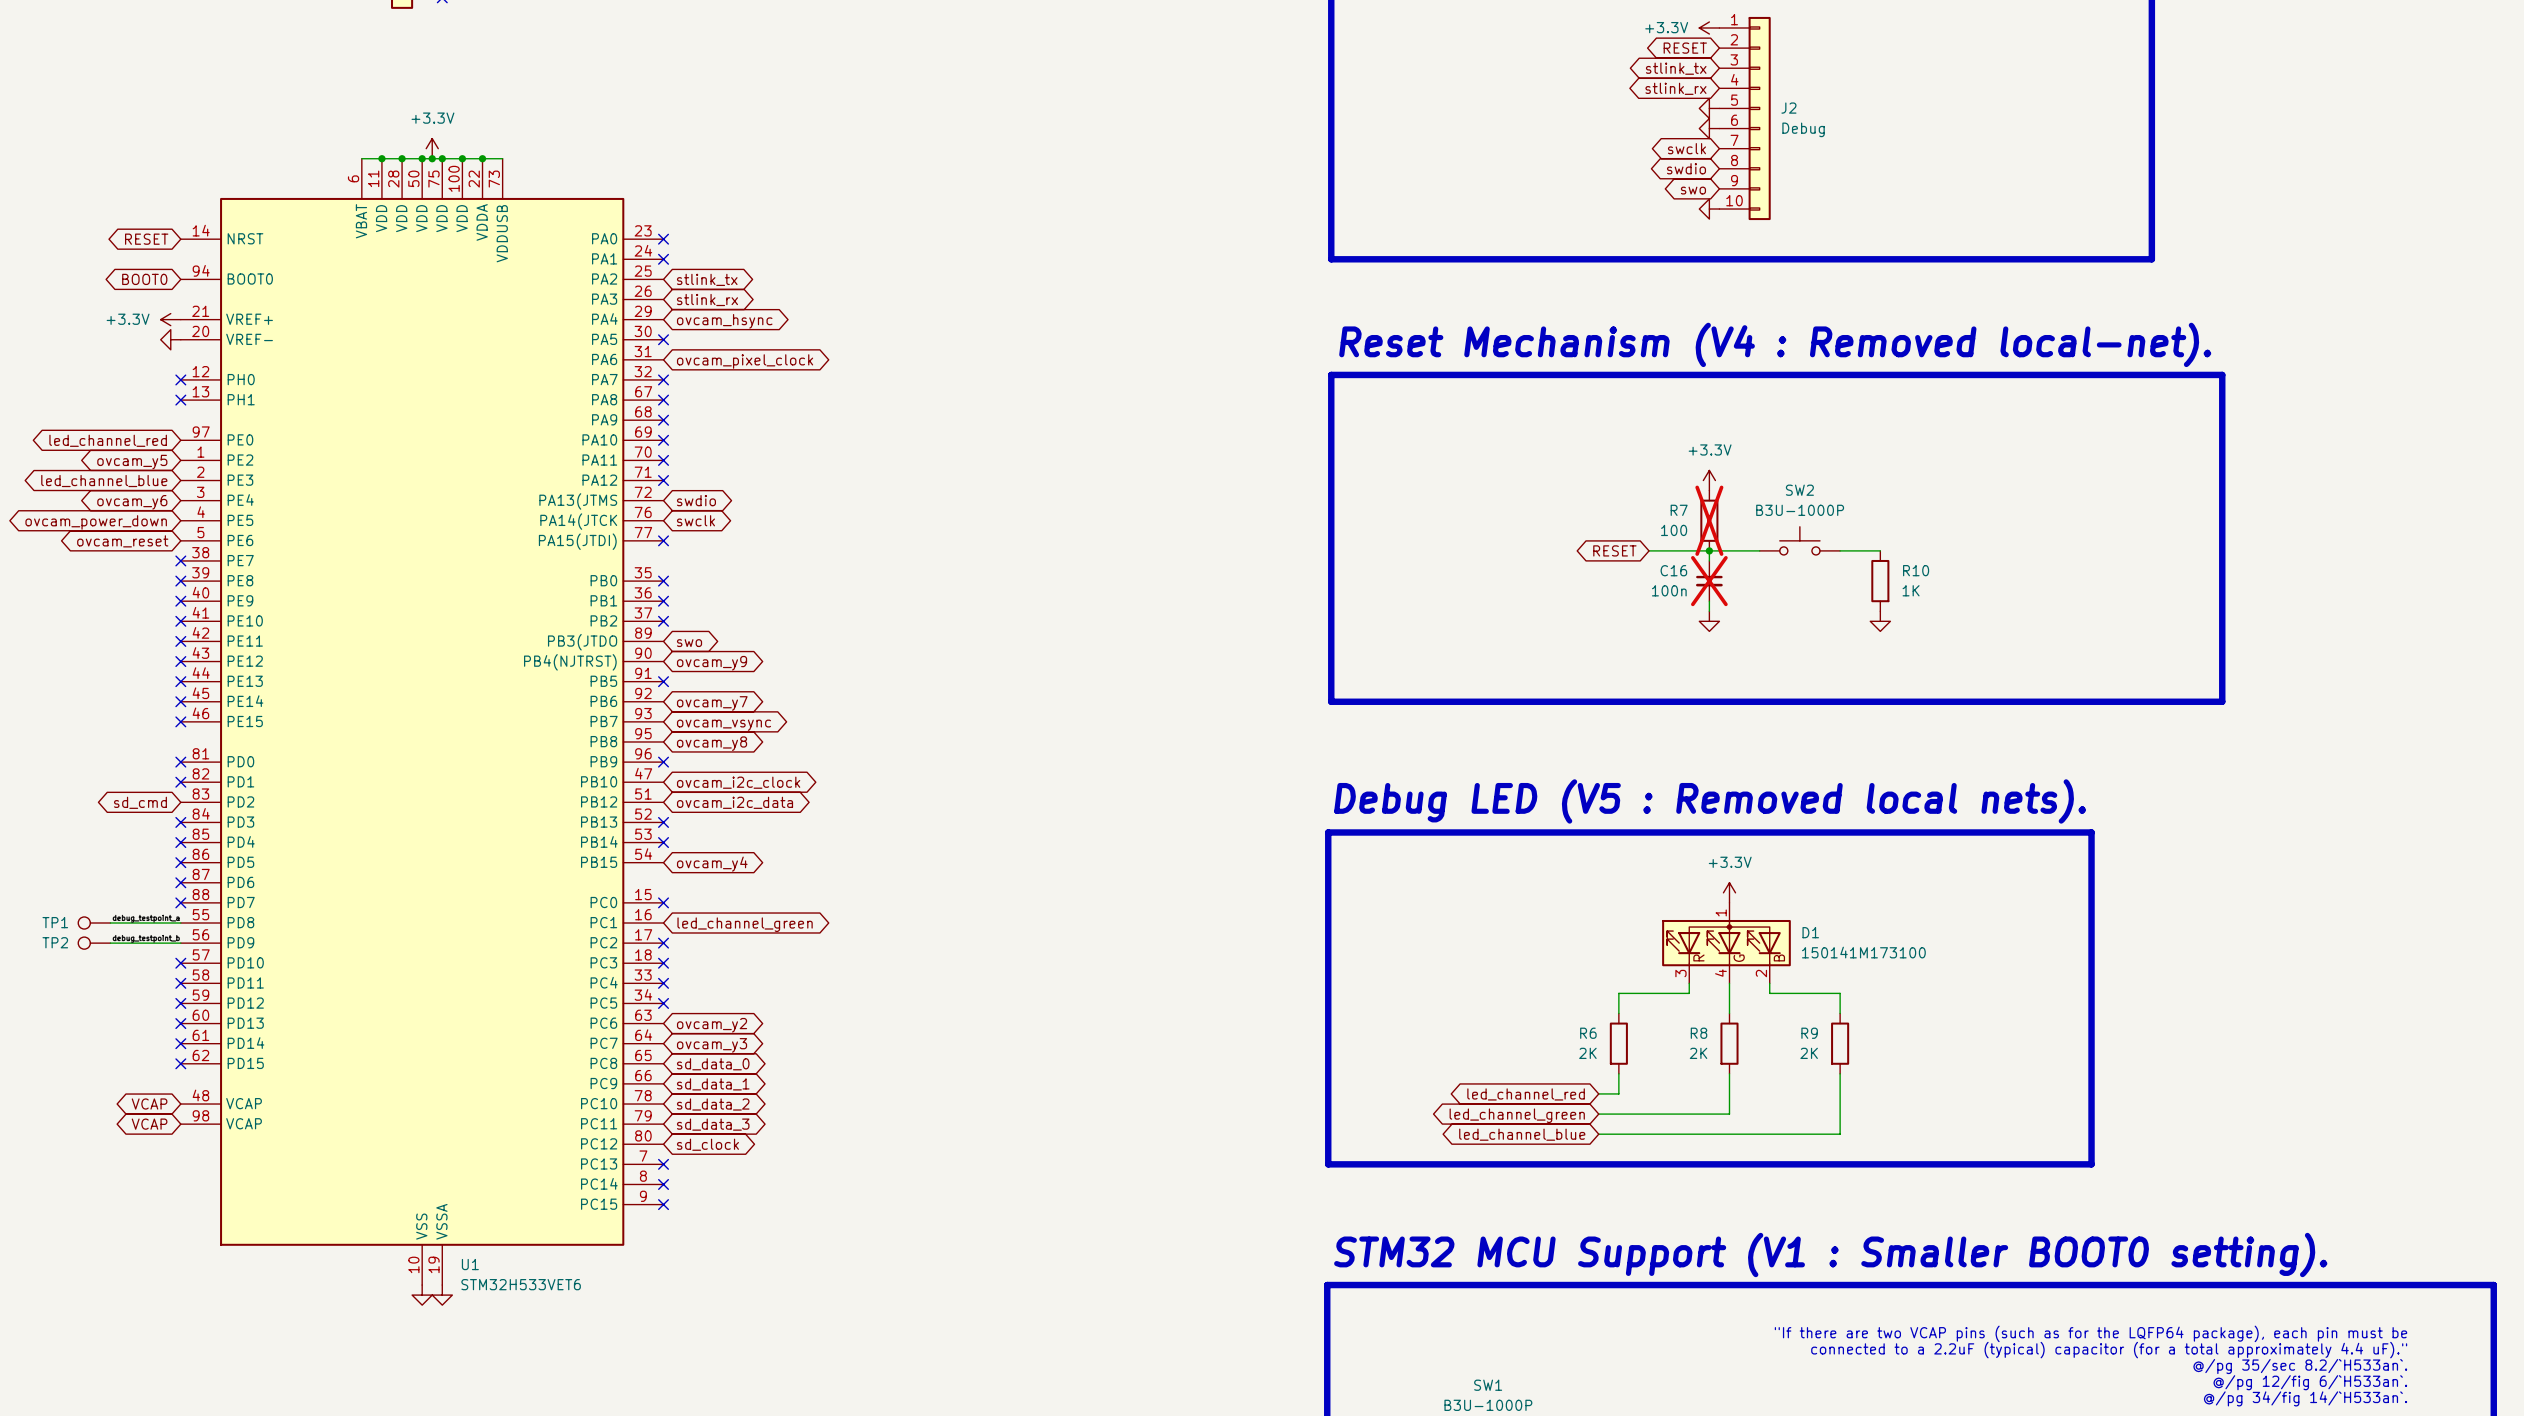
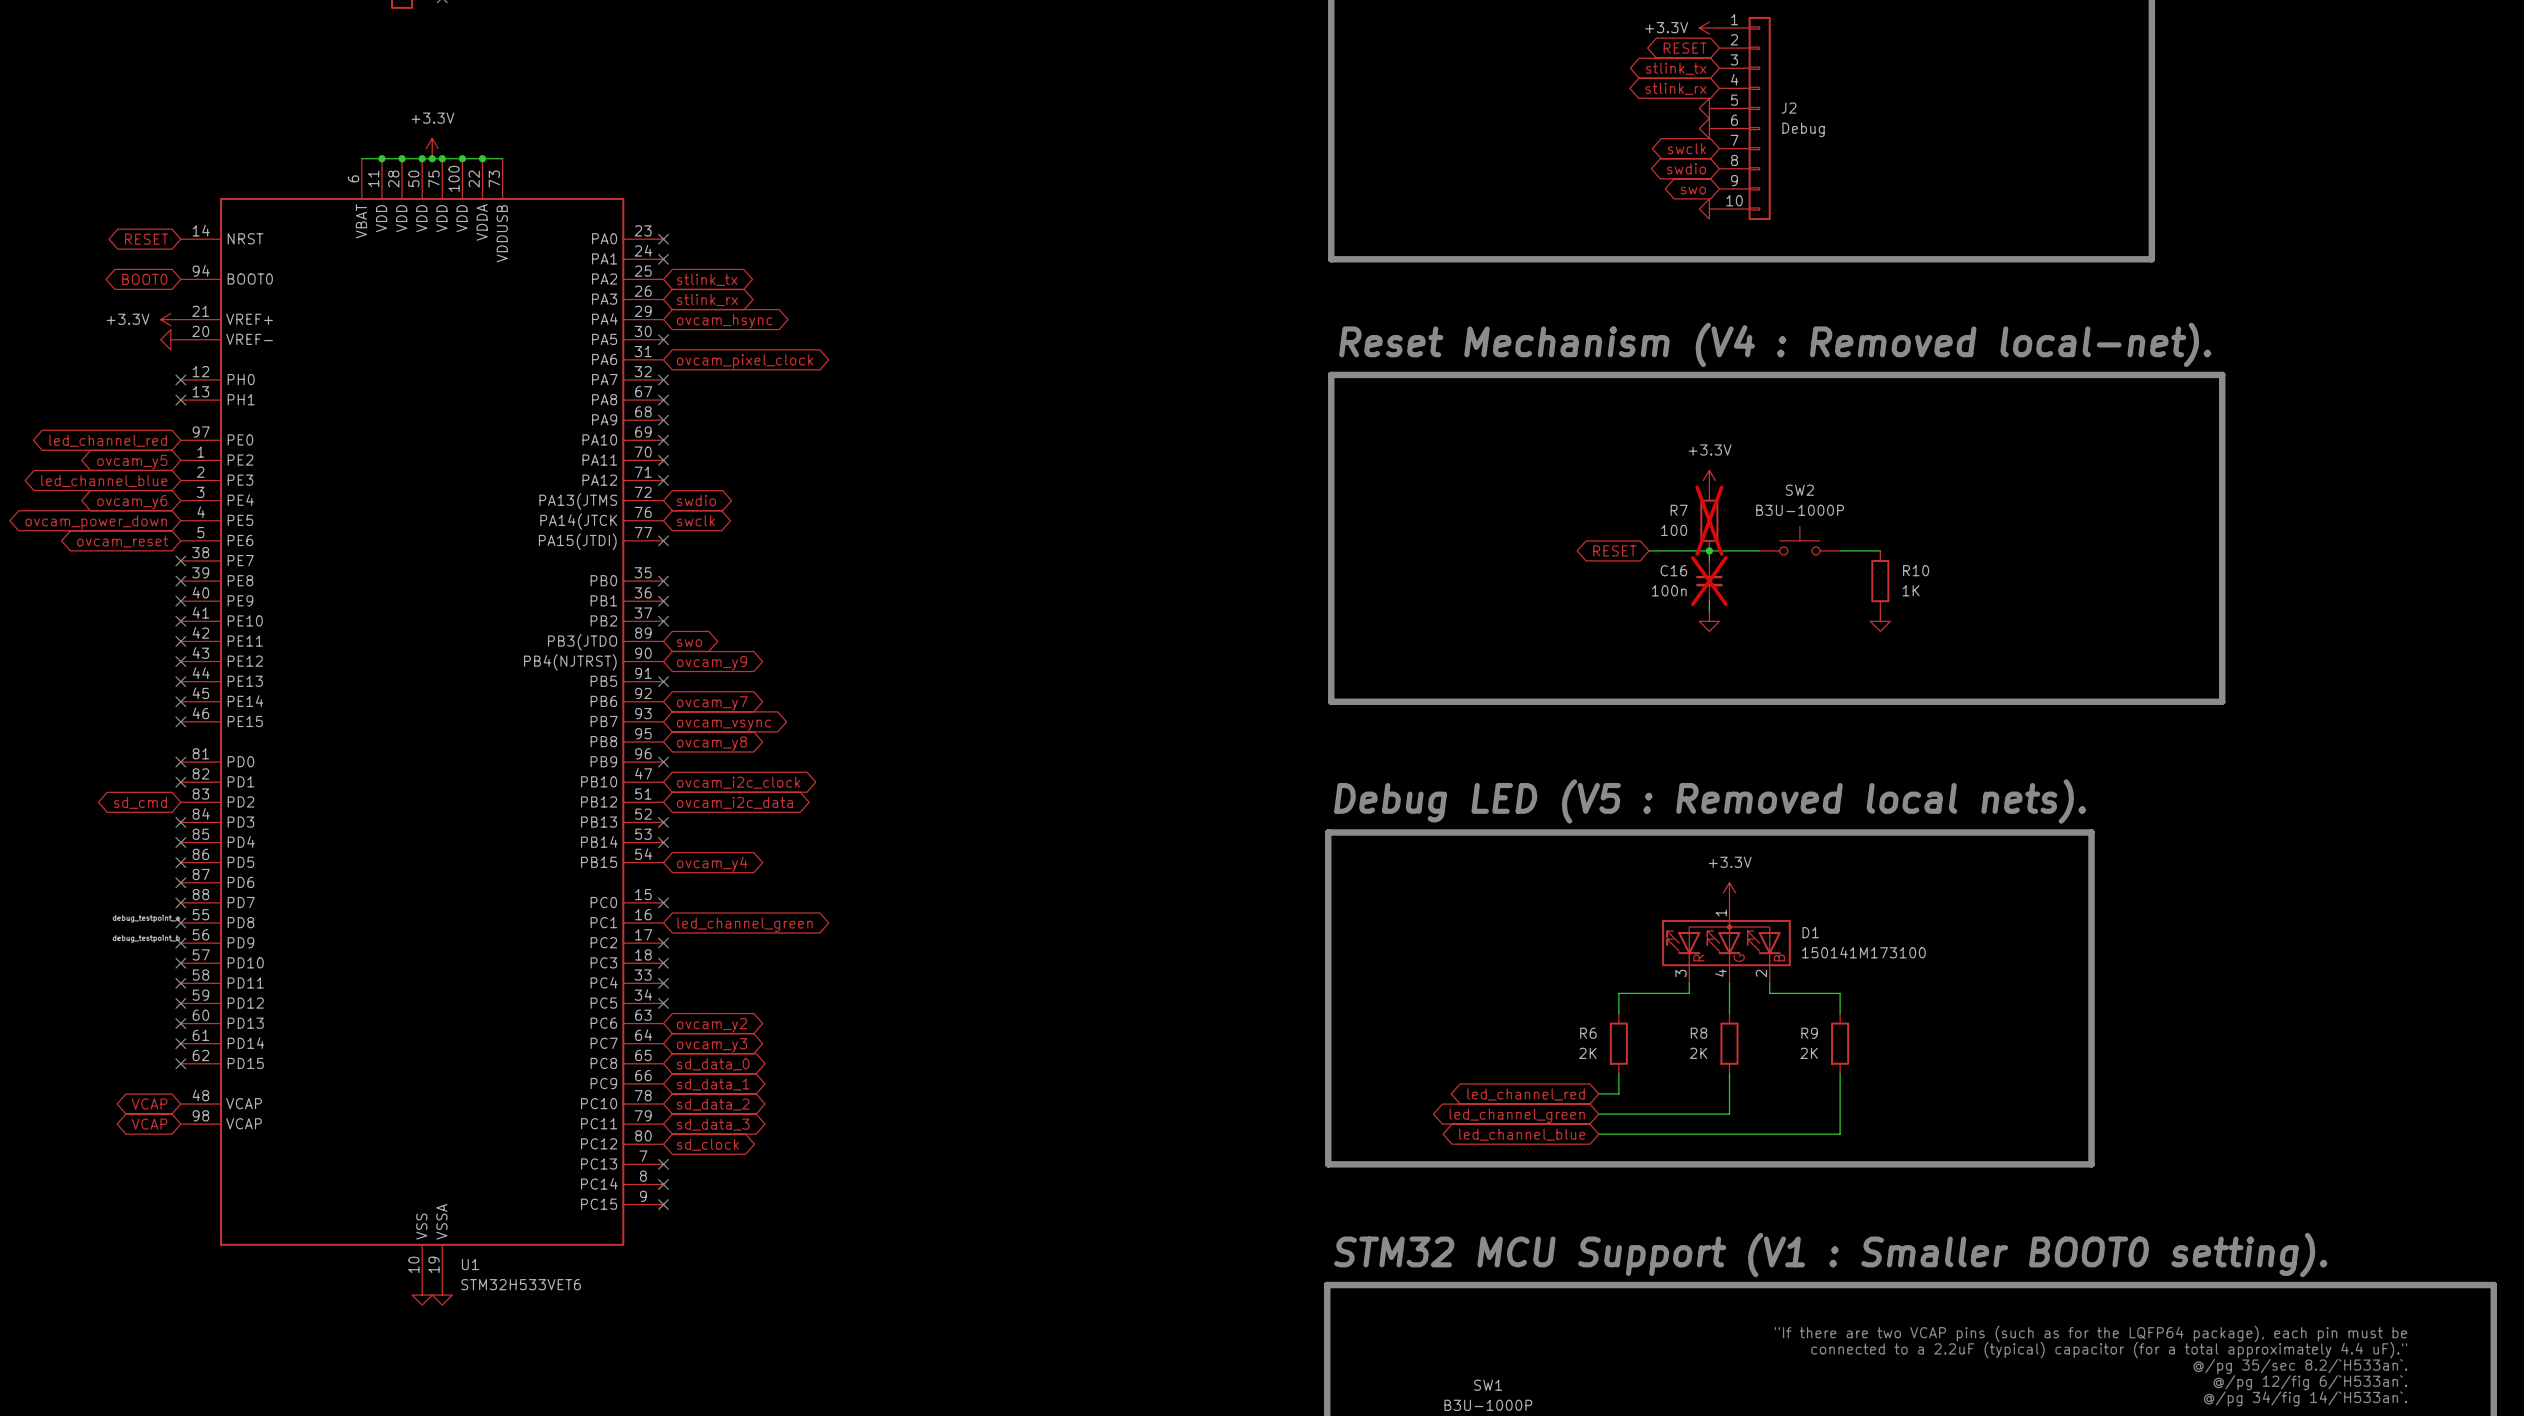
TP1: (94, 923) -> none
wire: (110, 923) (180, 923) -> none
no-connect mark: none -> (180, 923)
TP2: (94, 943) -> none
wire: (110, 943) (180, 943) -> none
no-connect mark: none -> (180, 943)

